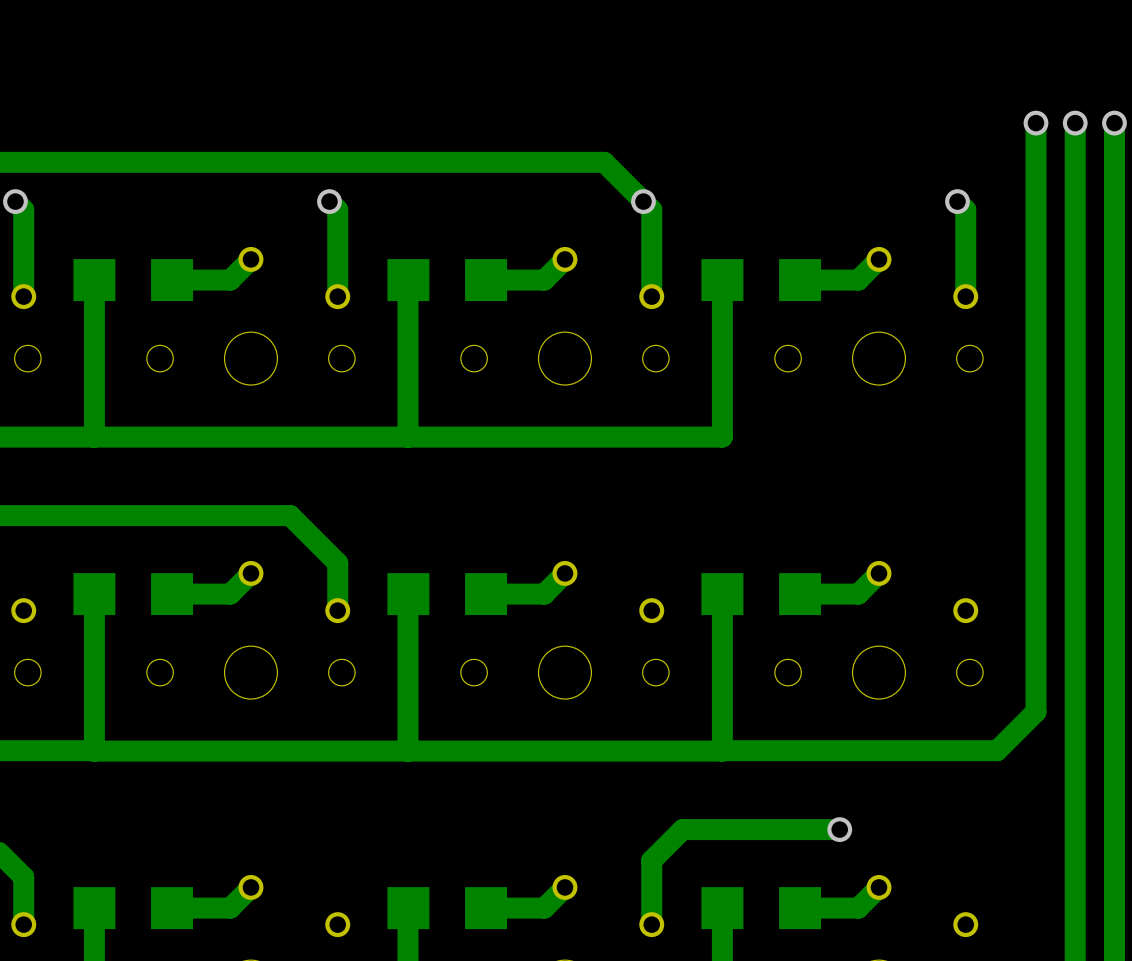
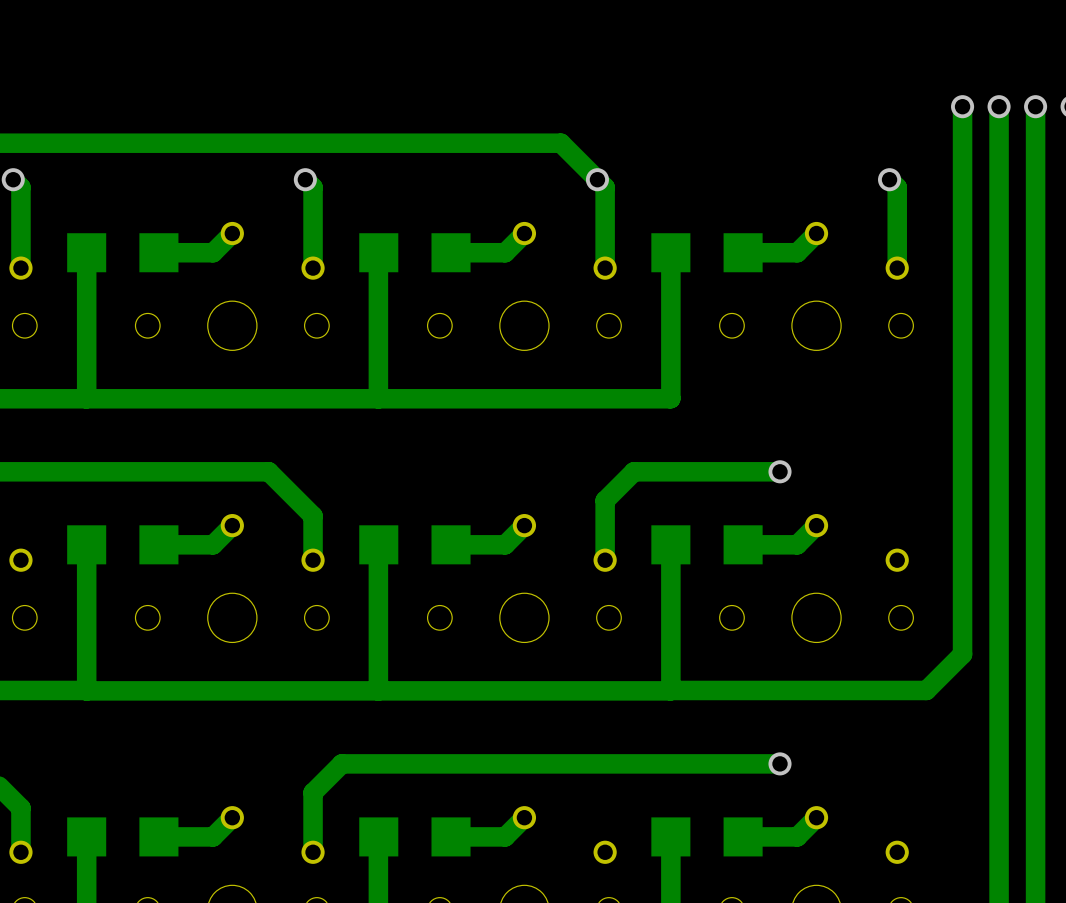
bottom track: none -> (780, 471) (633, 471) (605, 500) (605, 560)
via: none -> (780, 471)
bottom track: (682, 829) (651, 860) (651, 924) -> (633, 763) (341, 763) (313, 792) (313, 852)

